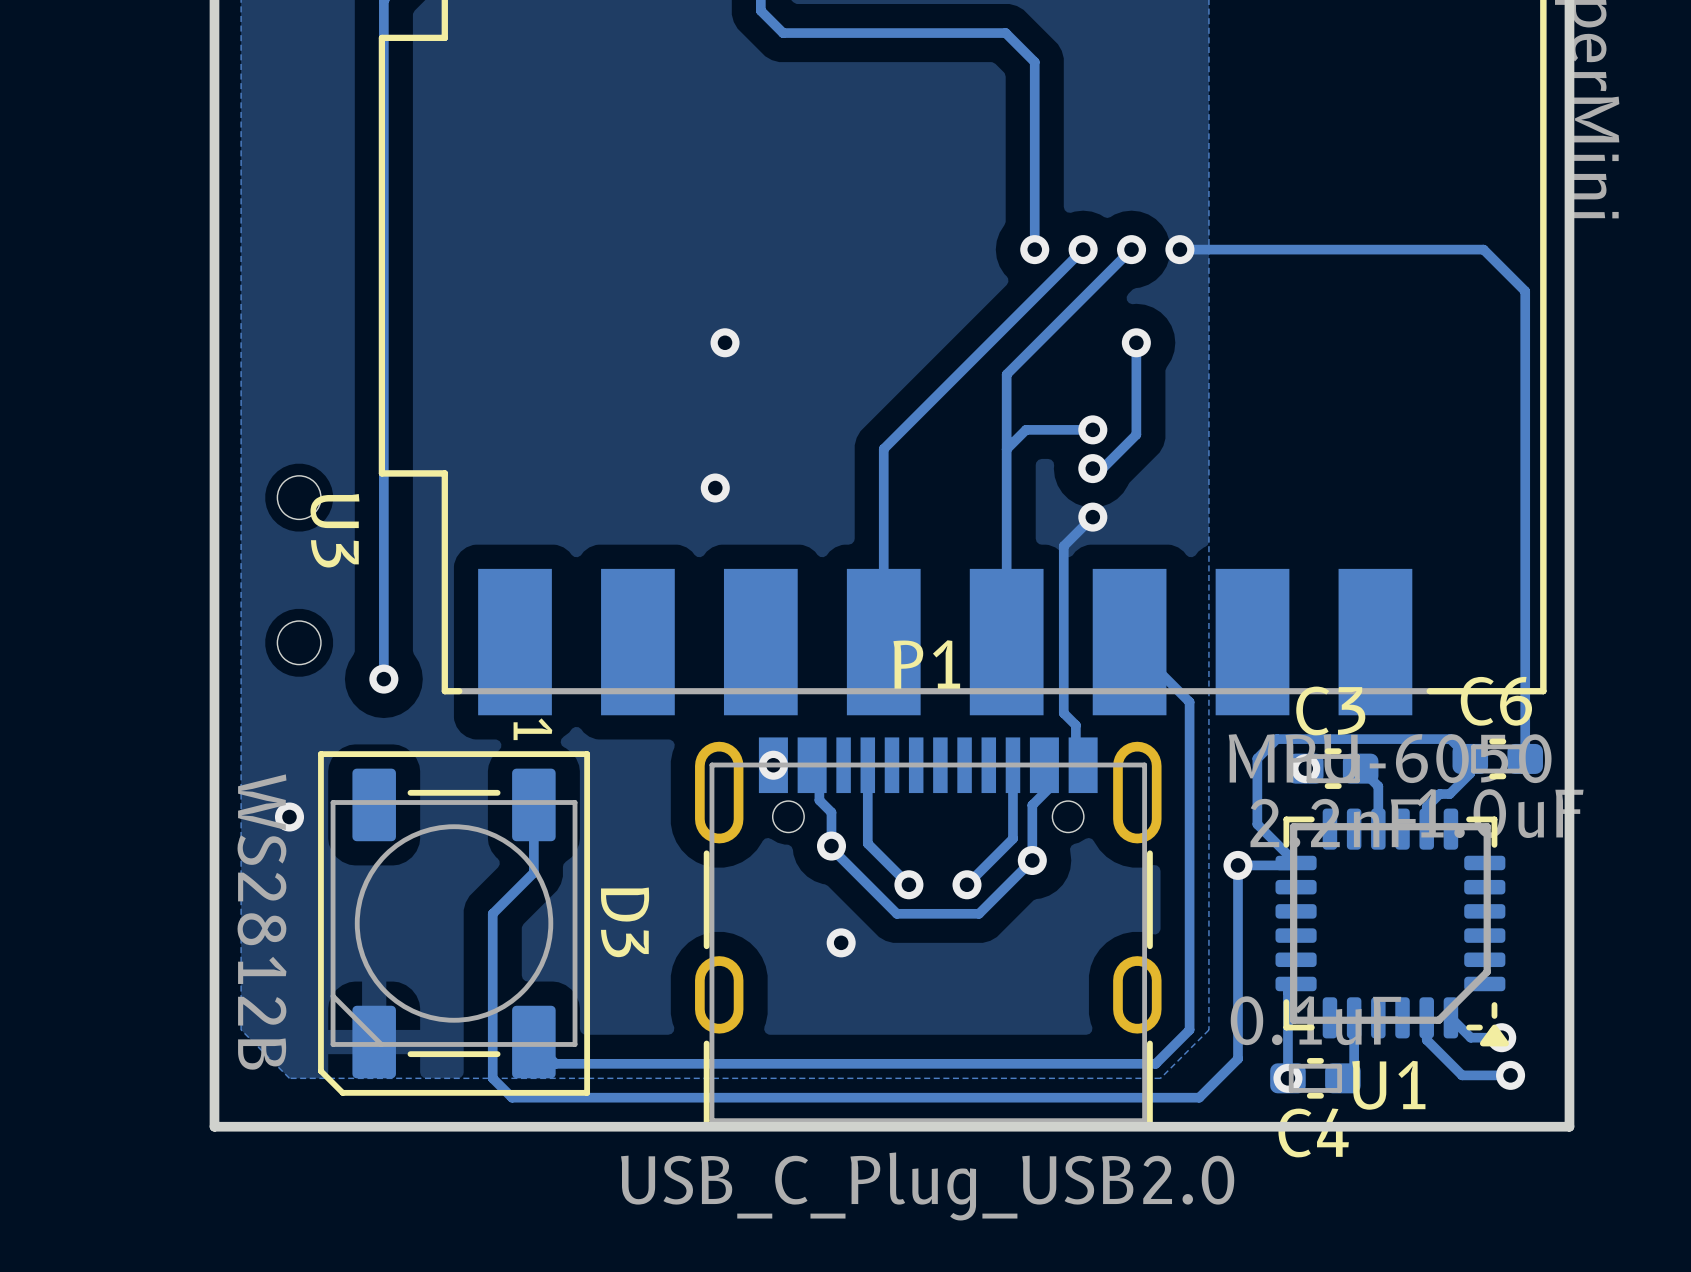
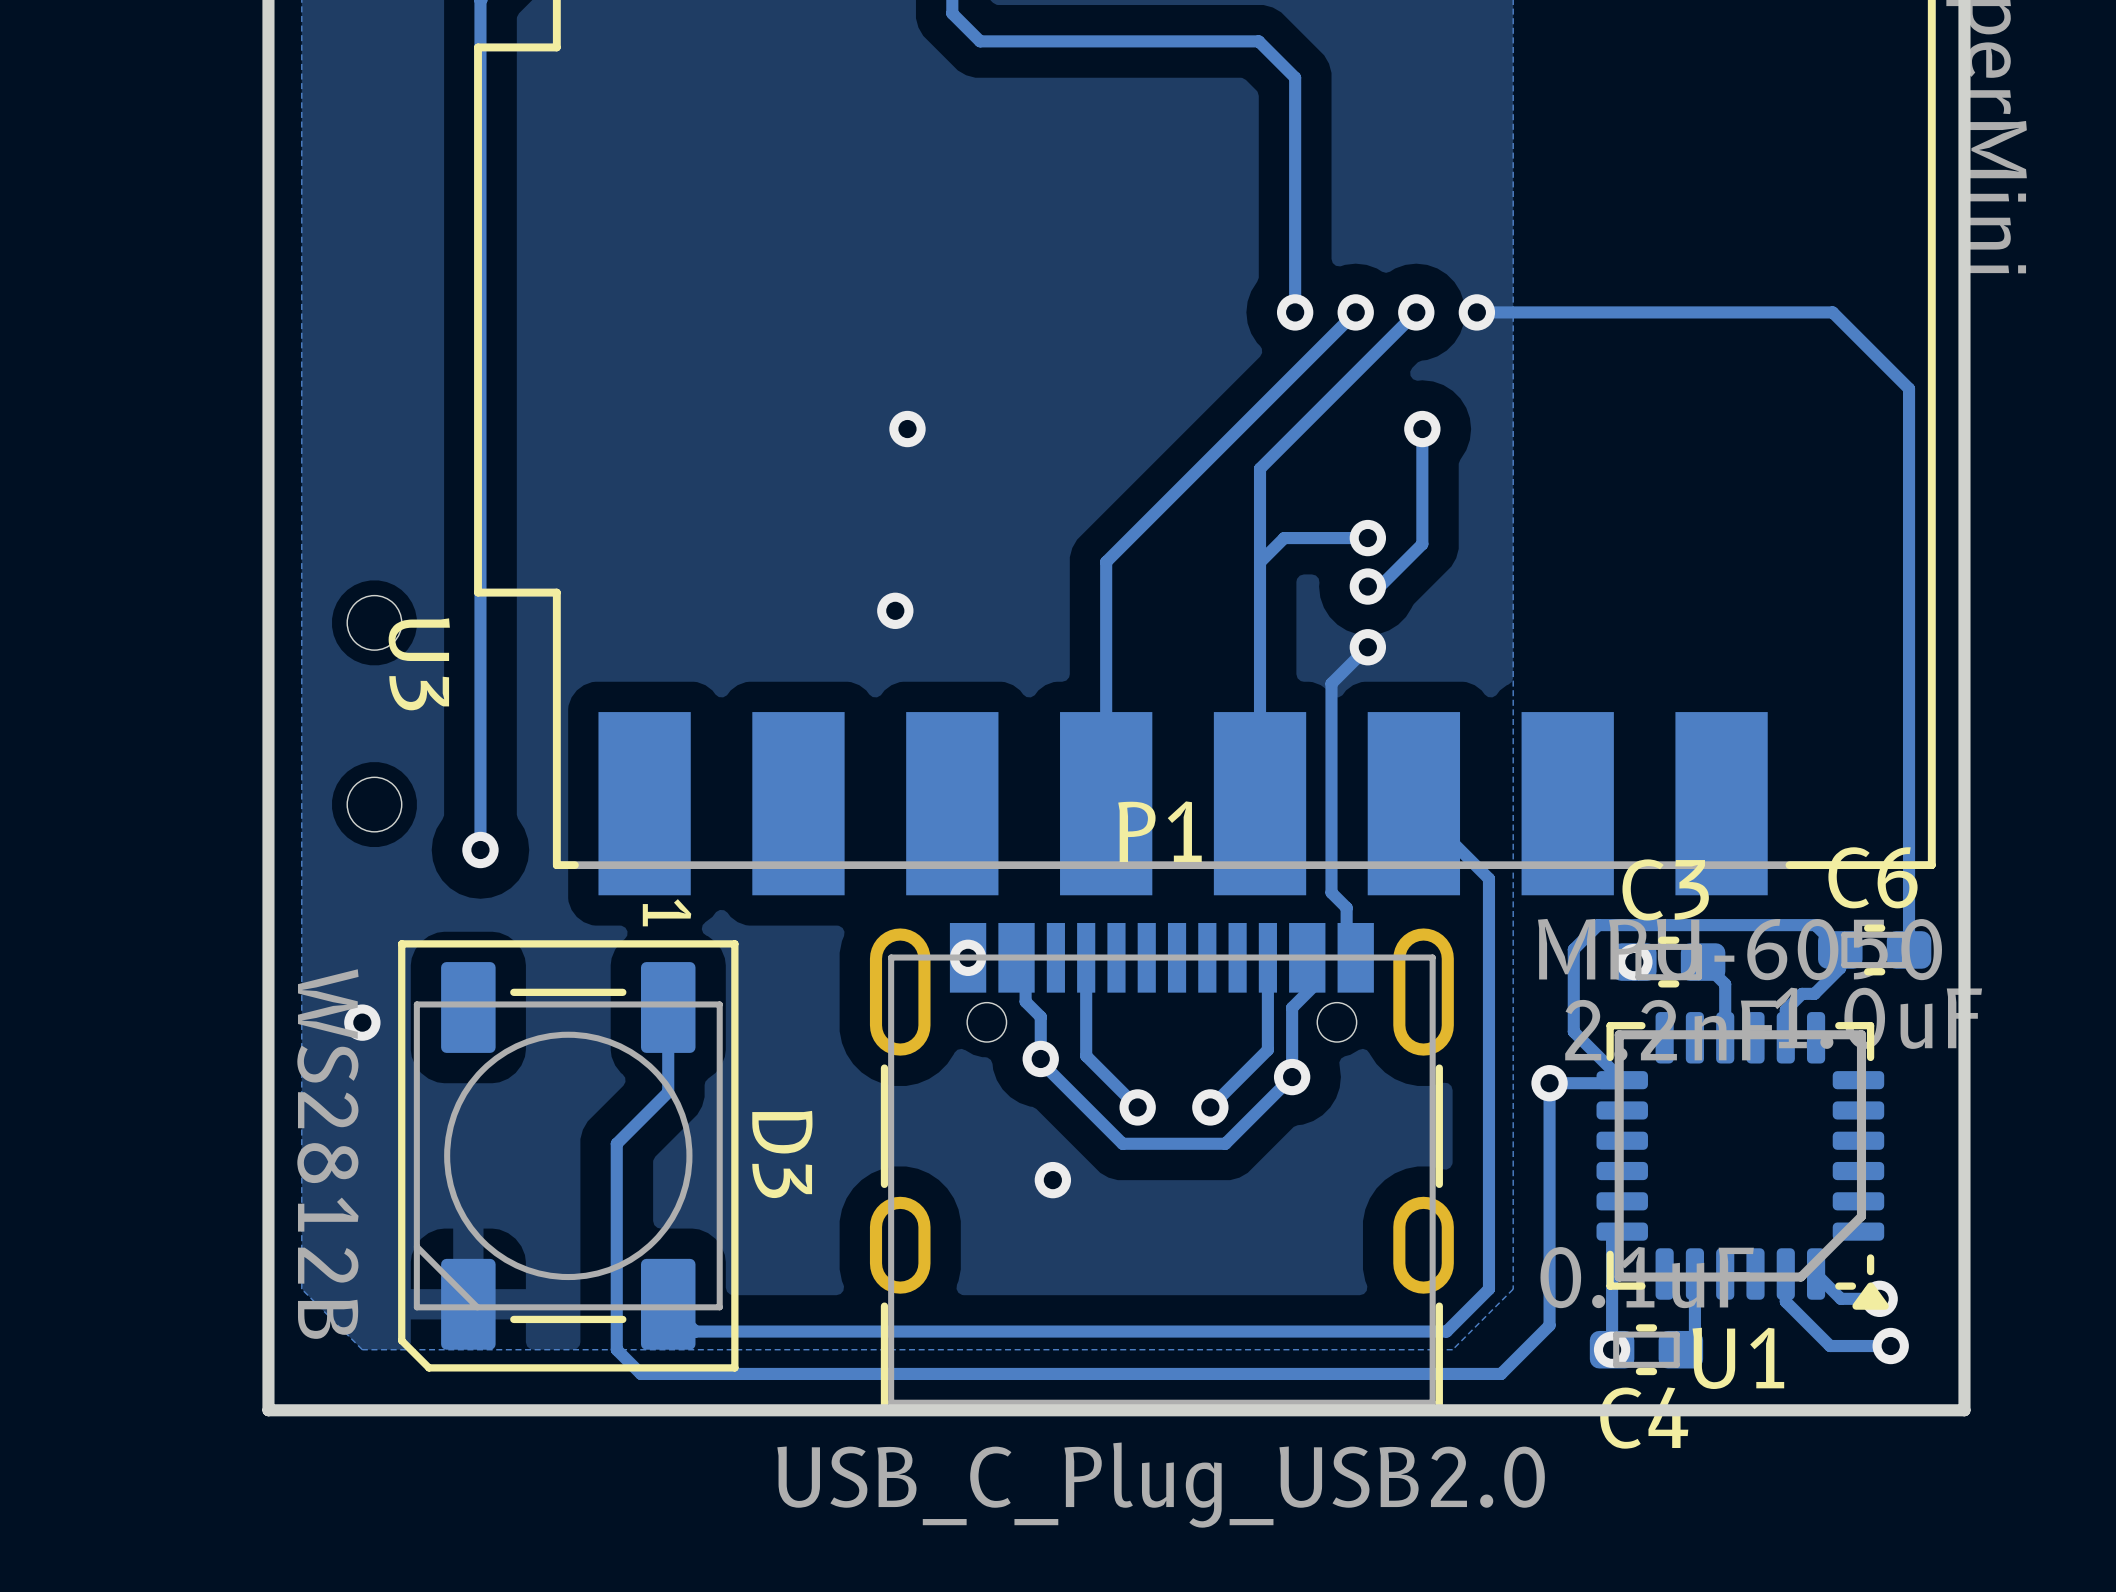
track: (1464, 249) (1483, 249) (1525, 291) (1525, 310) -> (1832, 312) (1909, 388)

